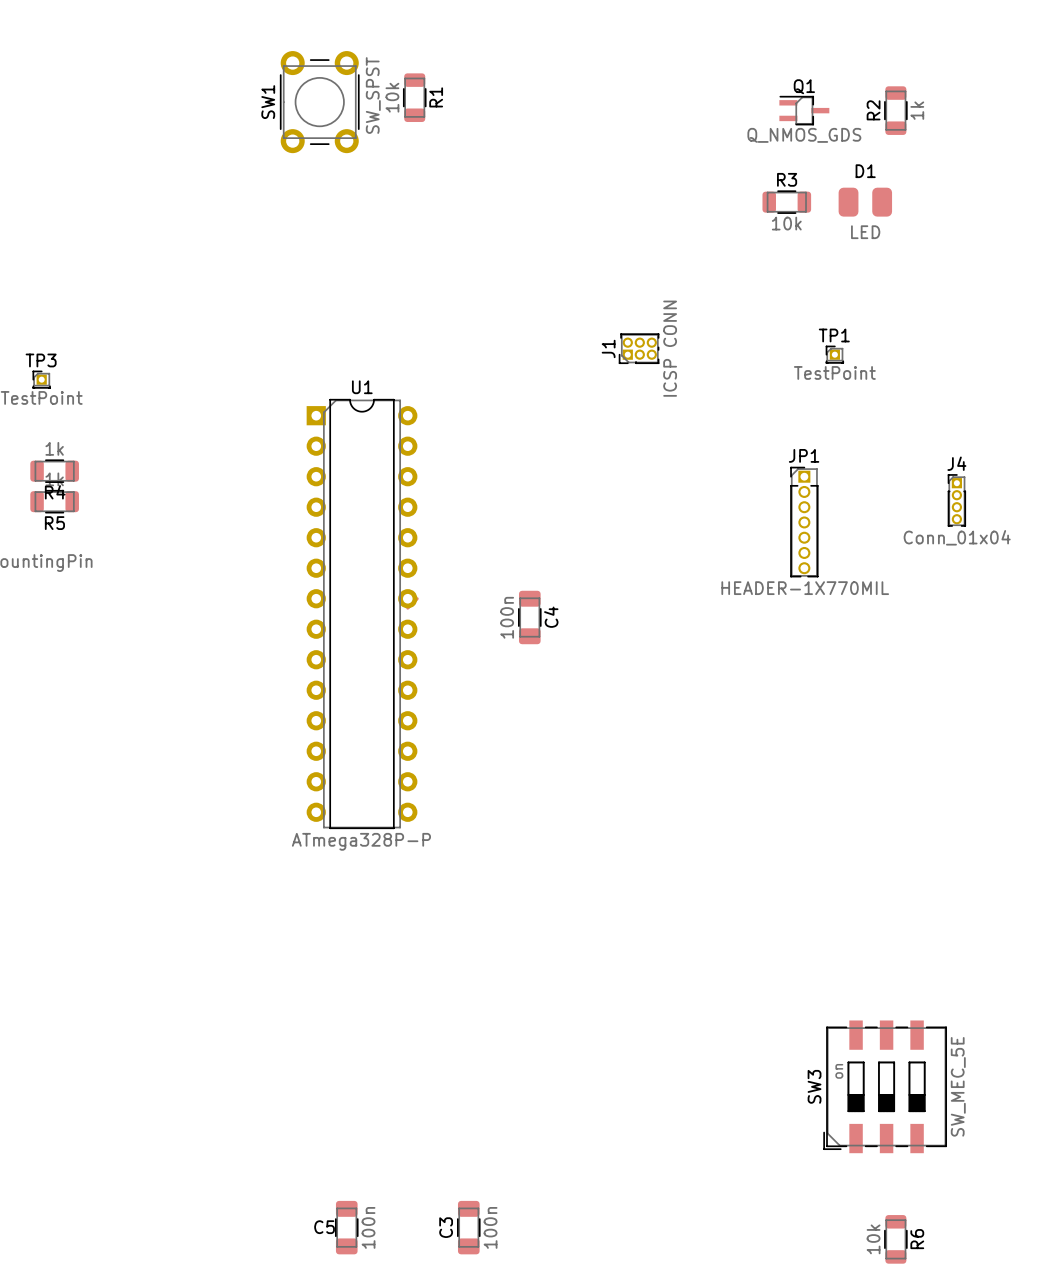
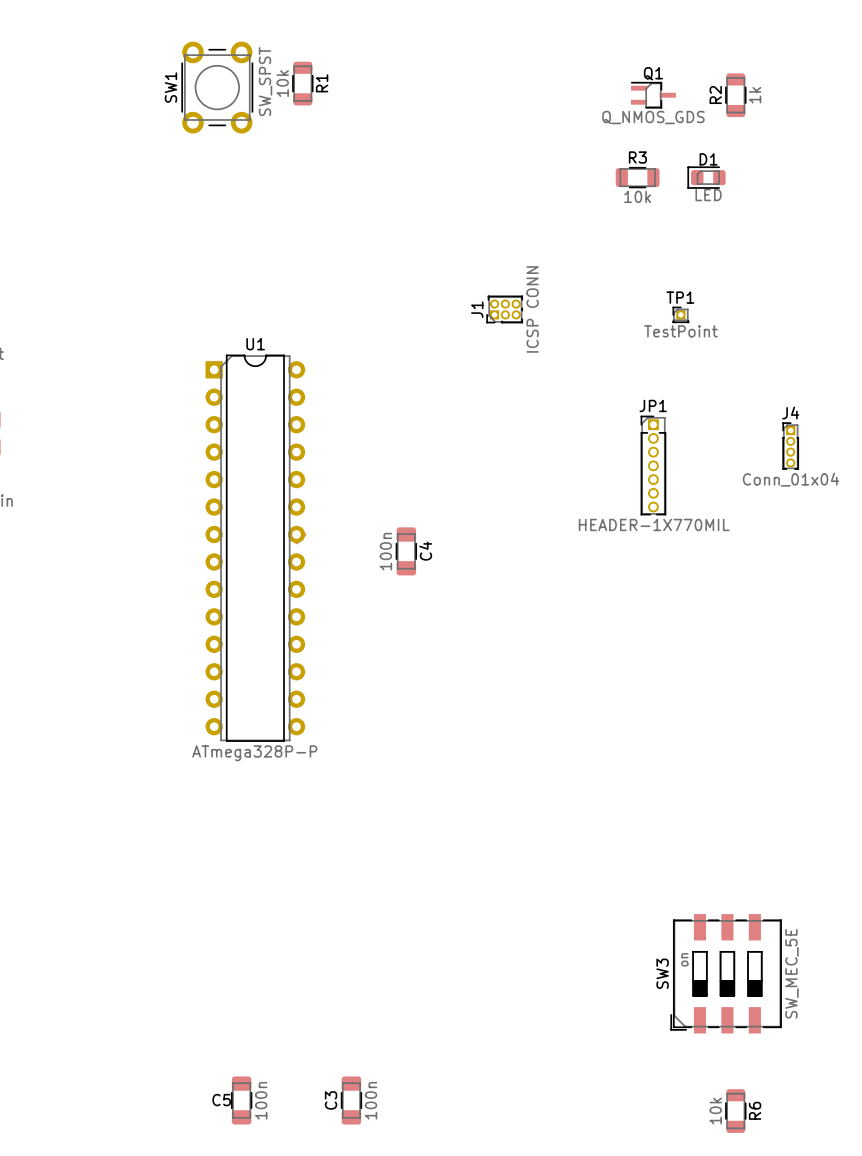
D1 footprint: [838, 187, 893, 217] -> [687, 166, 726, 189]

